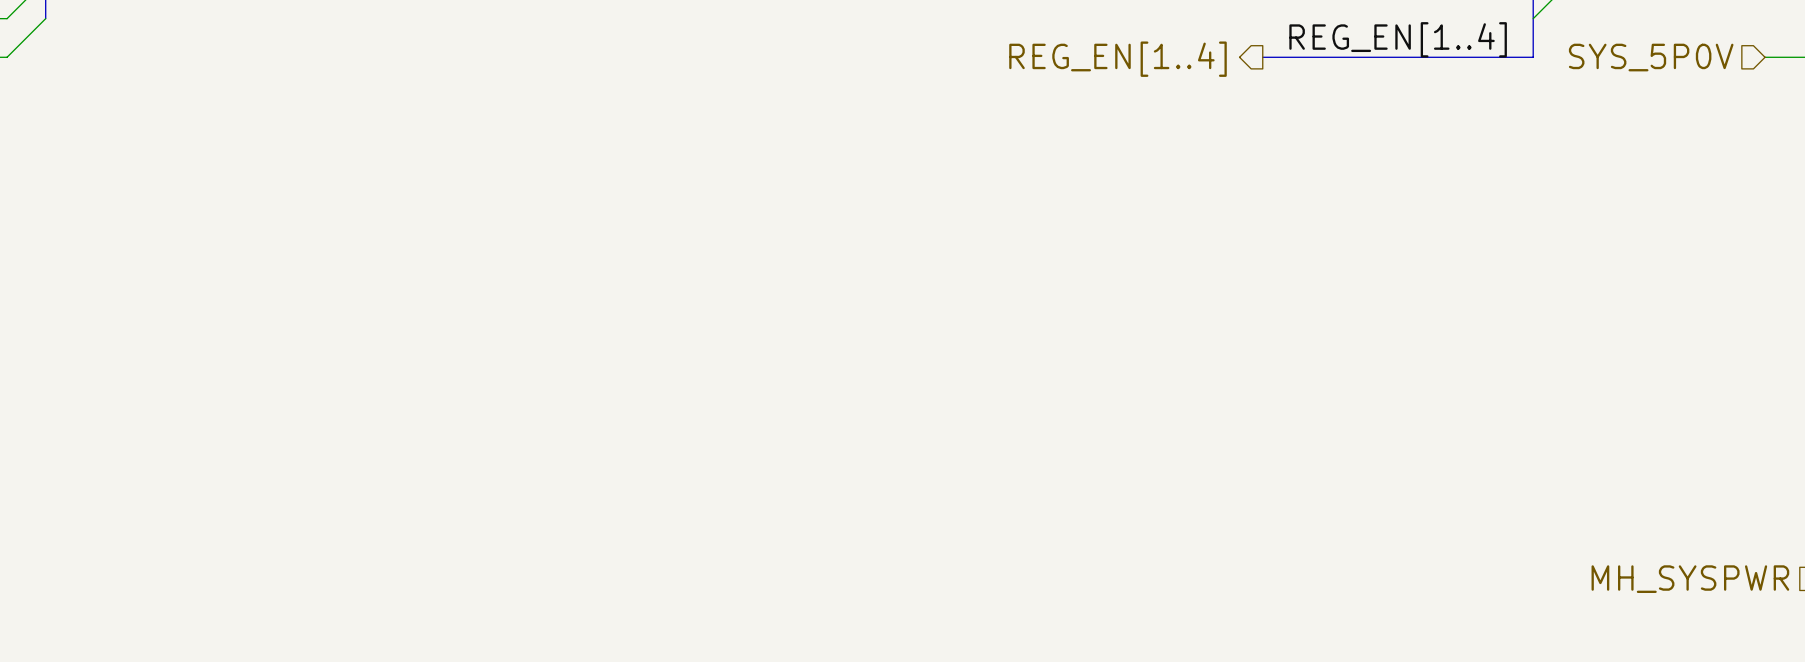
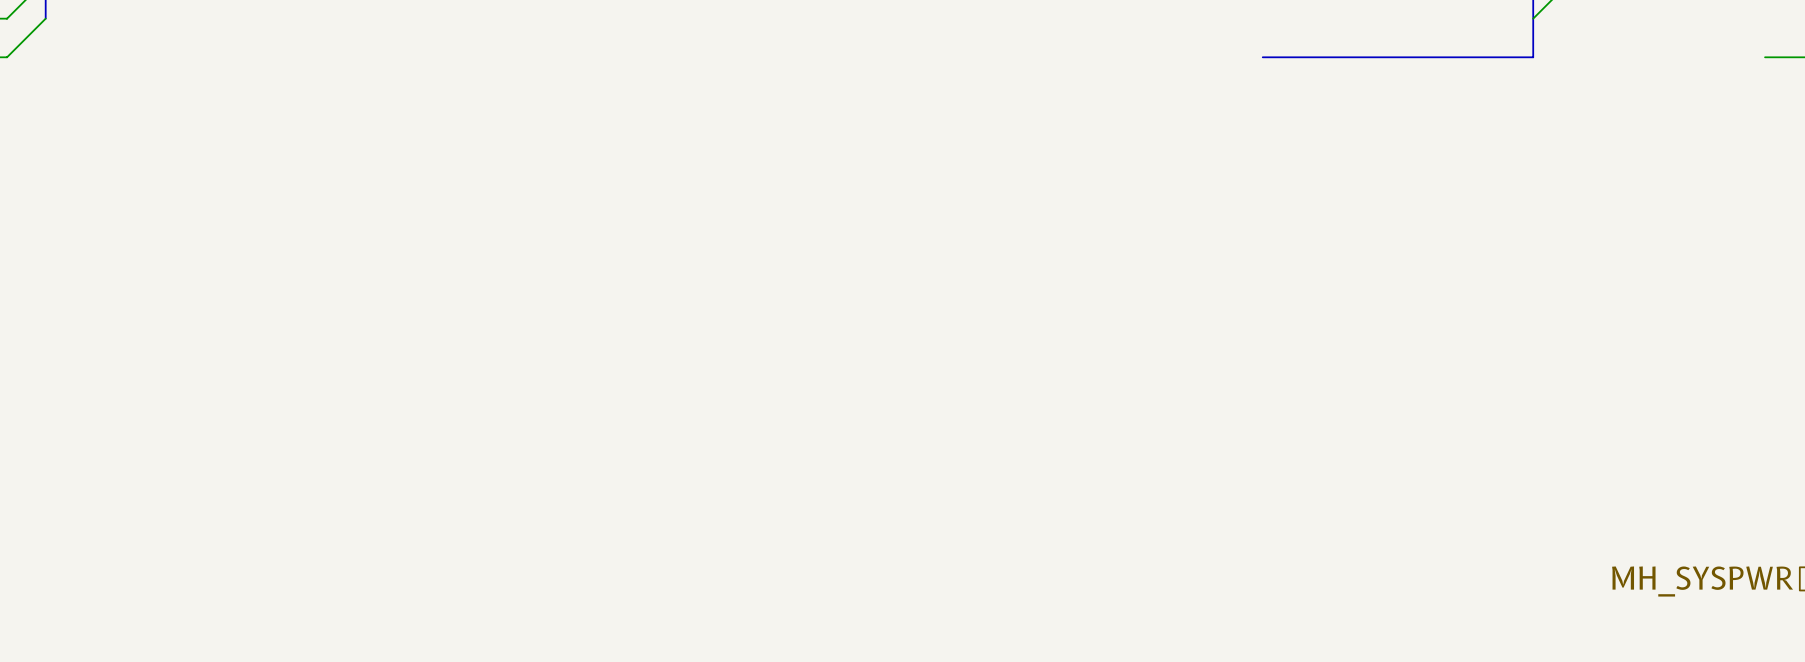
label: REG_EN[1..4] (1398, 39) -> none
hierarchical label: SYS_5P0V (1651, 57) -> none
hierarchical label: REG_EN[1..4] (1118, 59) -> none

